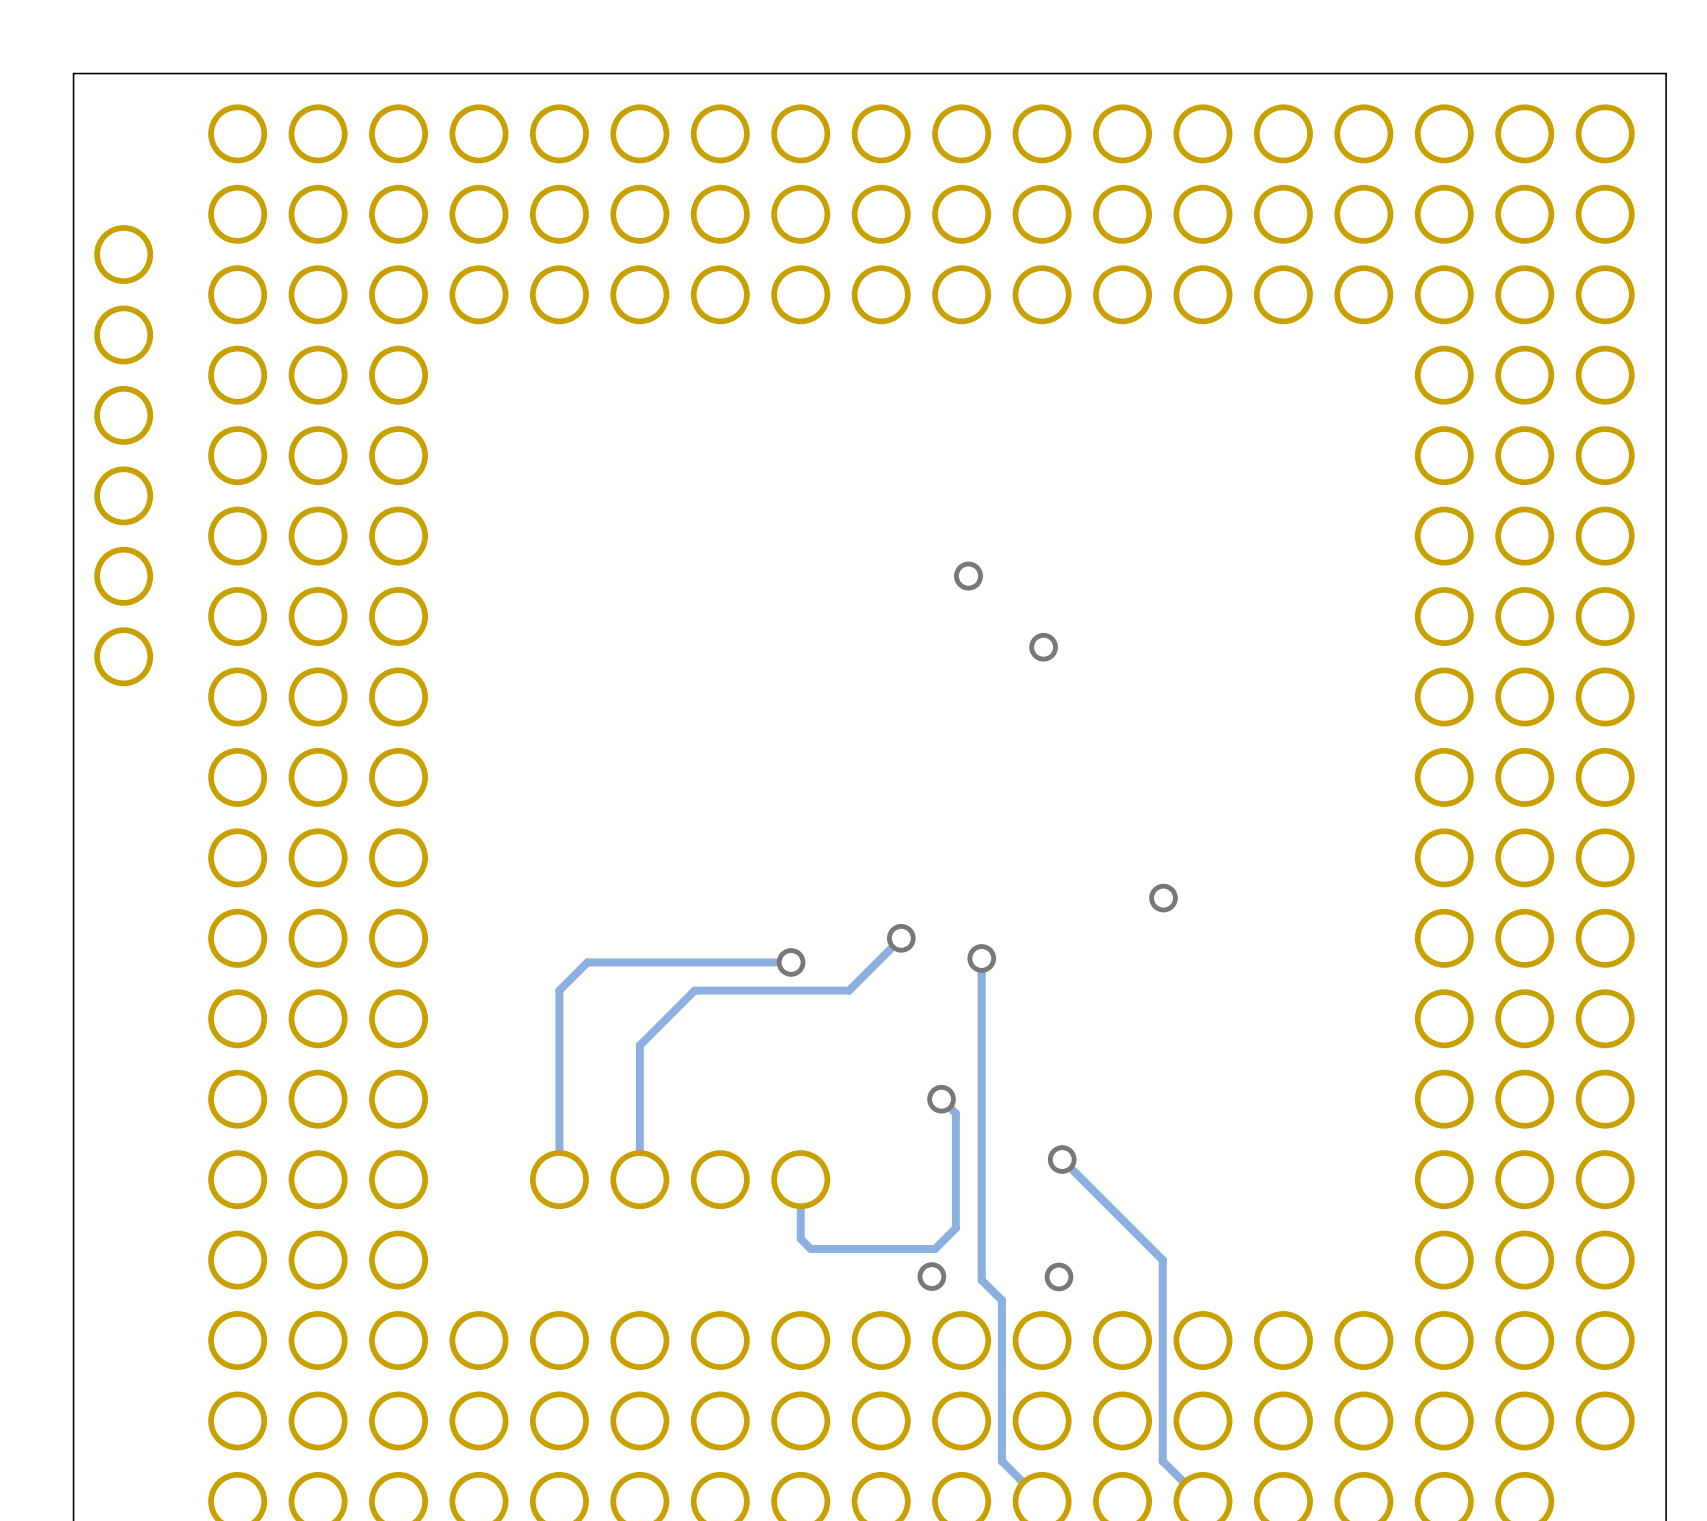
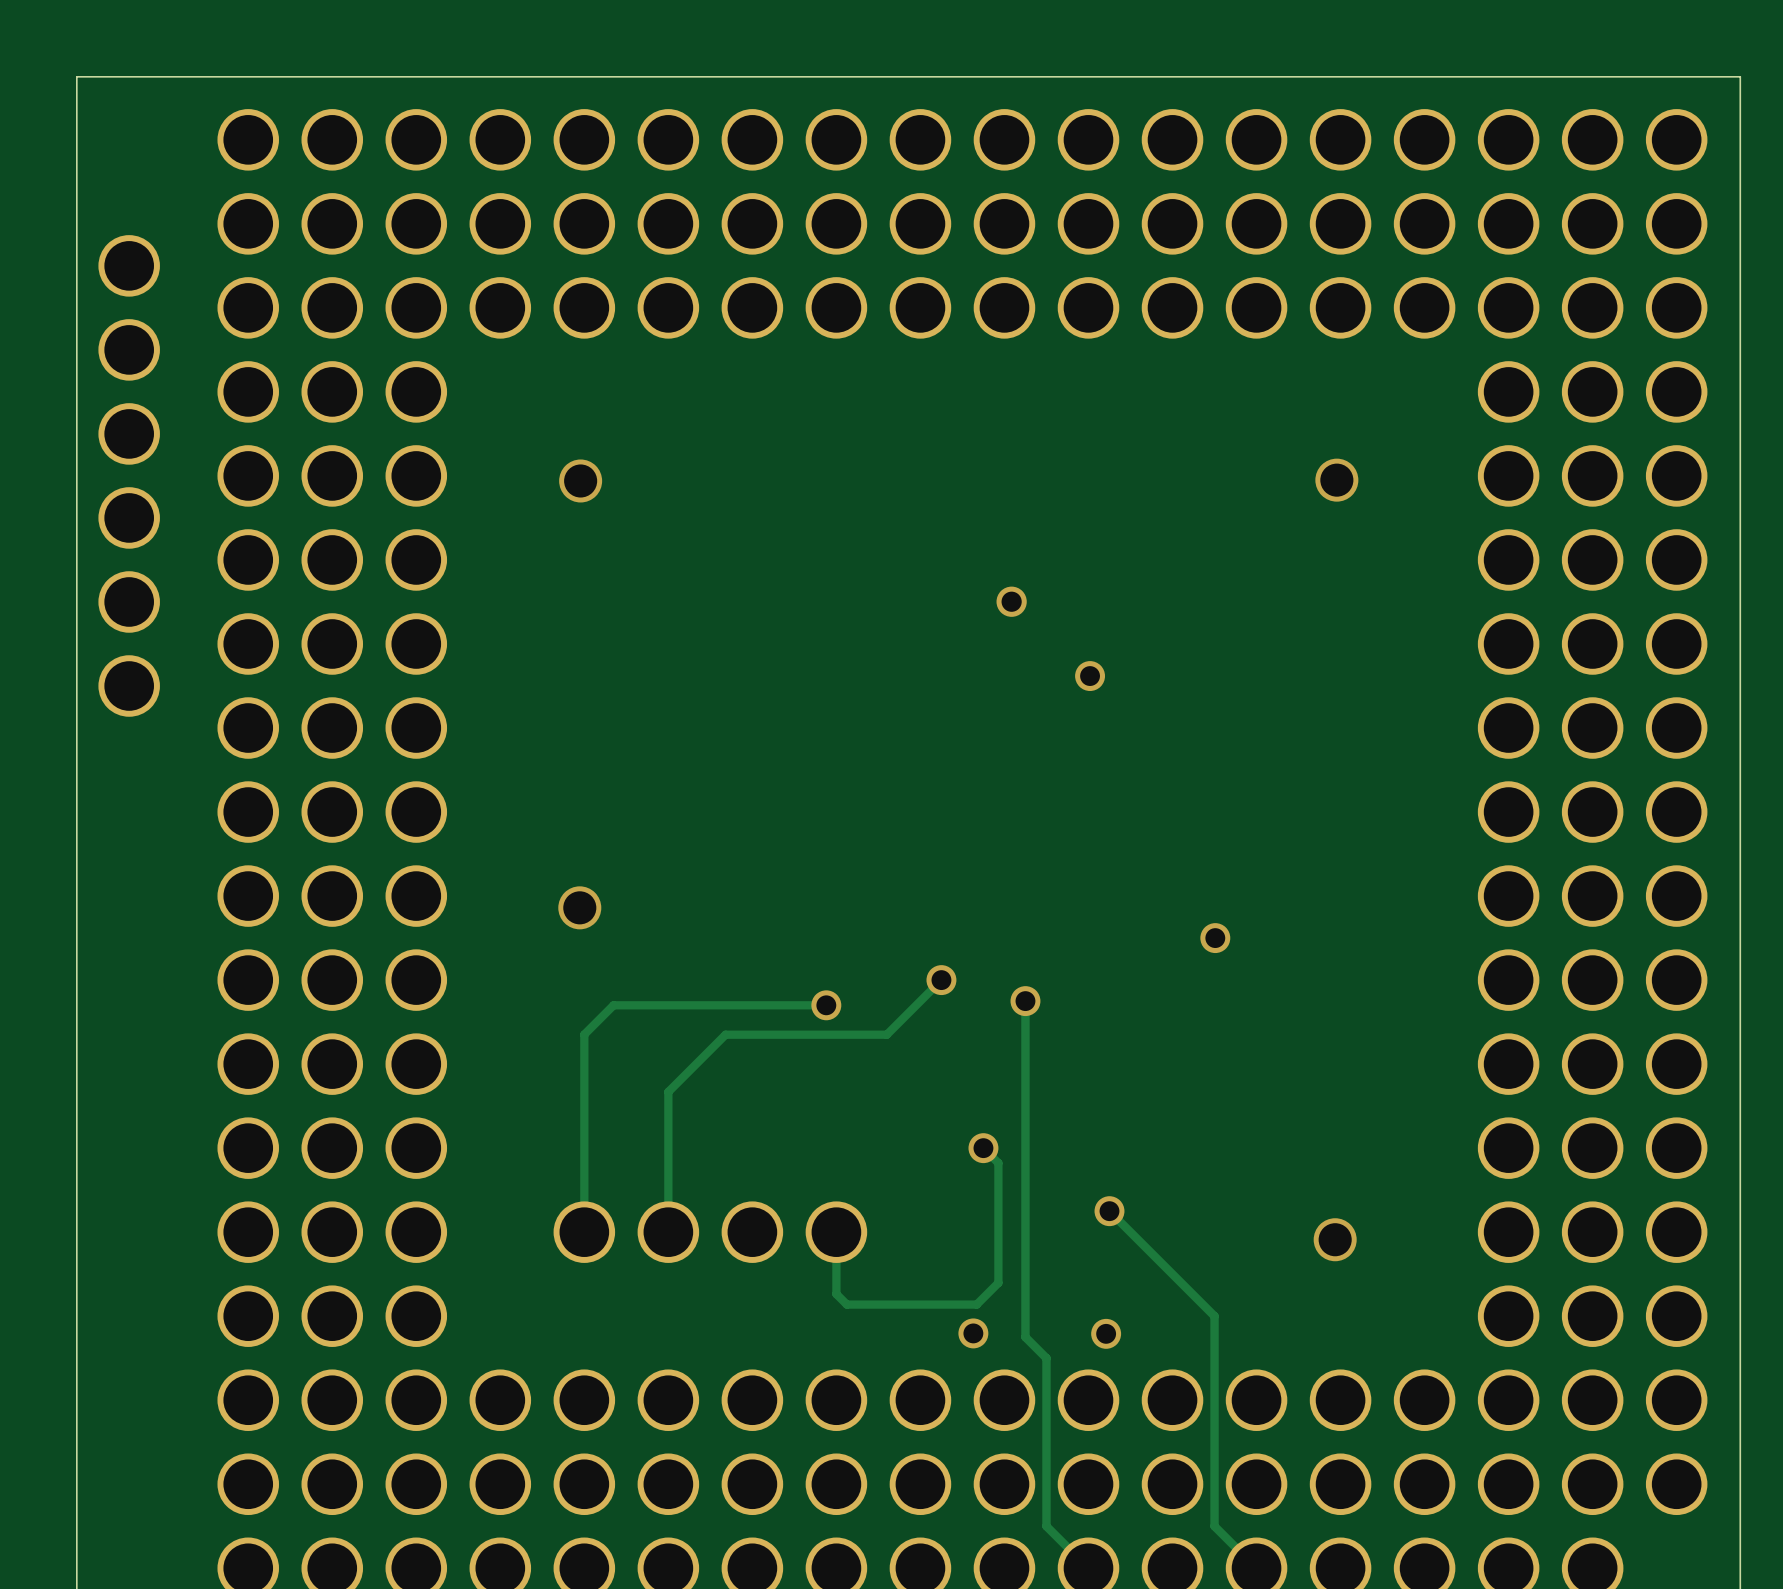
via: none -> (1336, 480)
via: none -> (580, 480)
via: none -> (579, 907)
via: none -> (1335, 1239)

